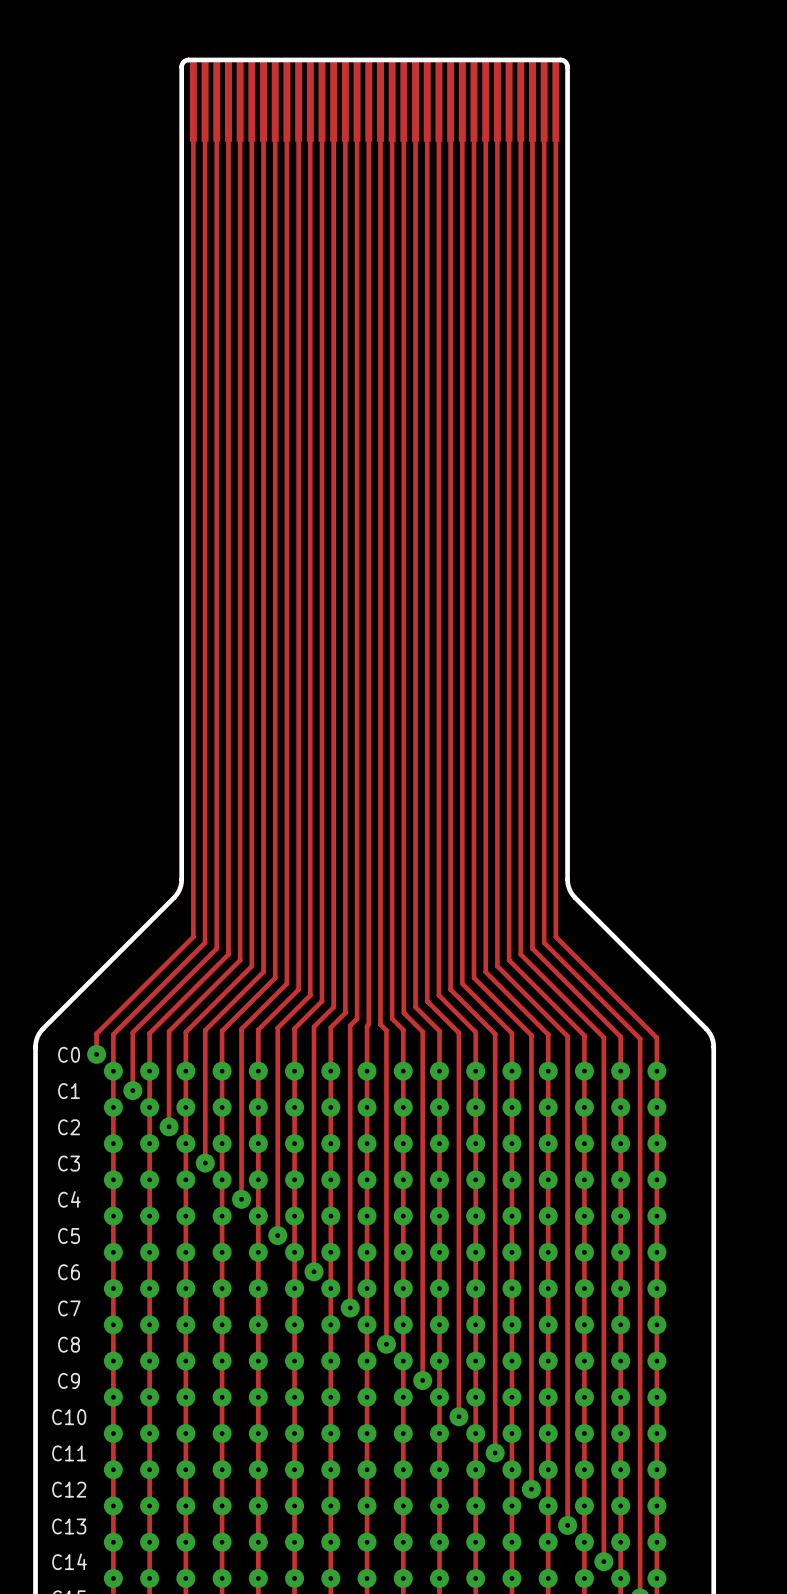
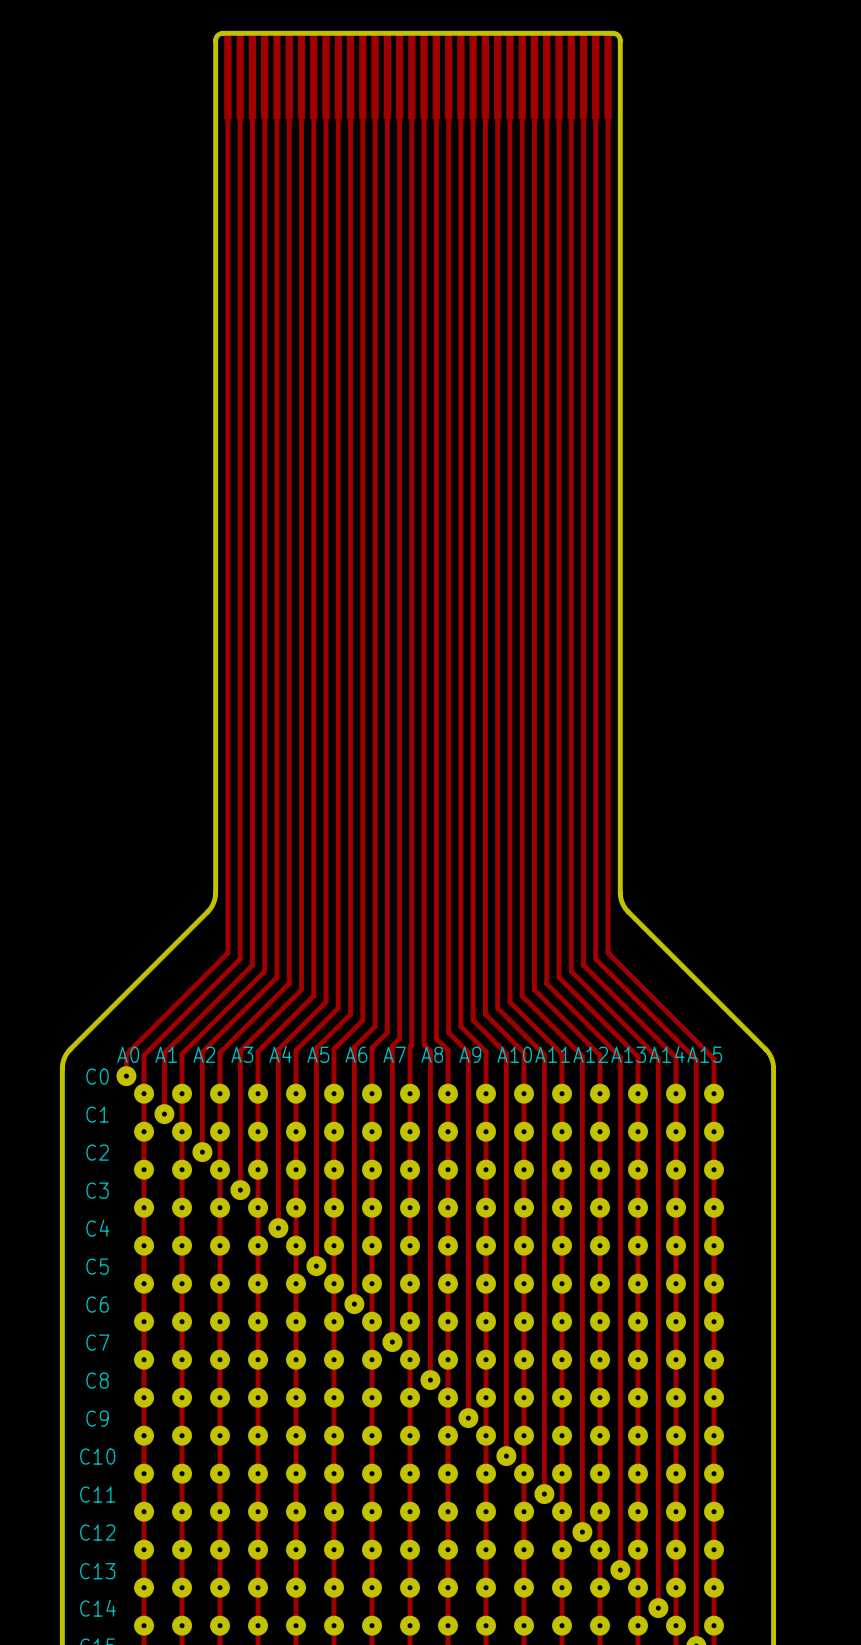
text: none -> A4 (280, 1054)
text: none -> A14 (667, 1054)
text: none -> A0 (128, 1054)
text: none -> A1 (166, 1054)
text: none -> A2 (204, 1054)
text: none -> A3 (242, 1054)
text: none -> A5 (318, 1054)
text: none -> A6 (356, 1054)
text: none -> A7 (394, 1054)
text: none -> A8 (432, 1054)
text: none -> A9 (470, 1054)
text: none -> A10 (514, 1054)
text: none -> A11 (552, 1054)
text: none -> A12 (590, 1054)
text: none -> A13 (628, 1054)
text: none -> A15 (704, 1054)

